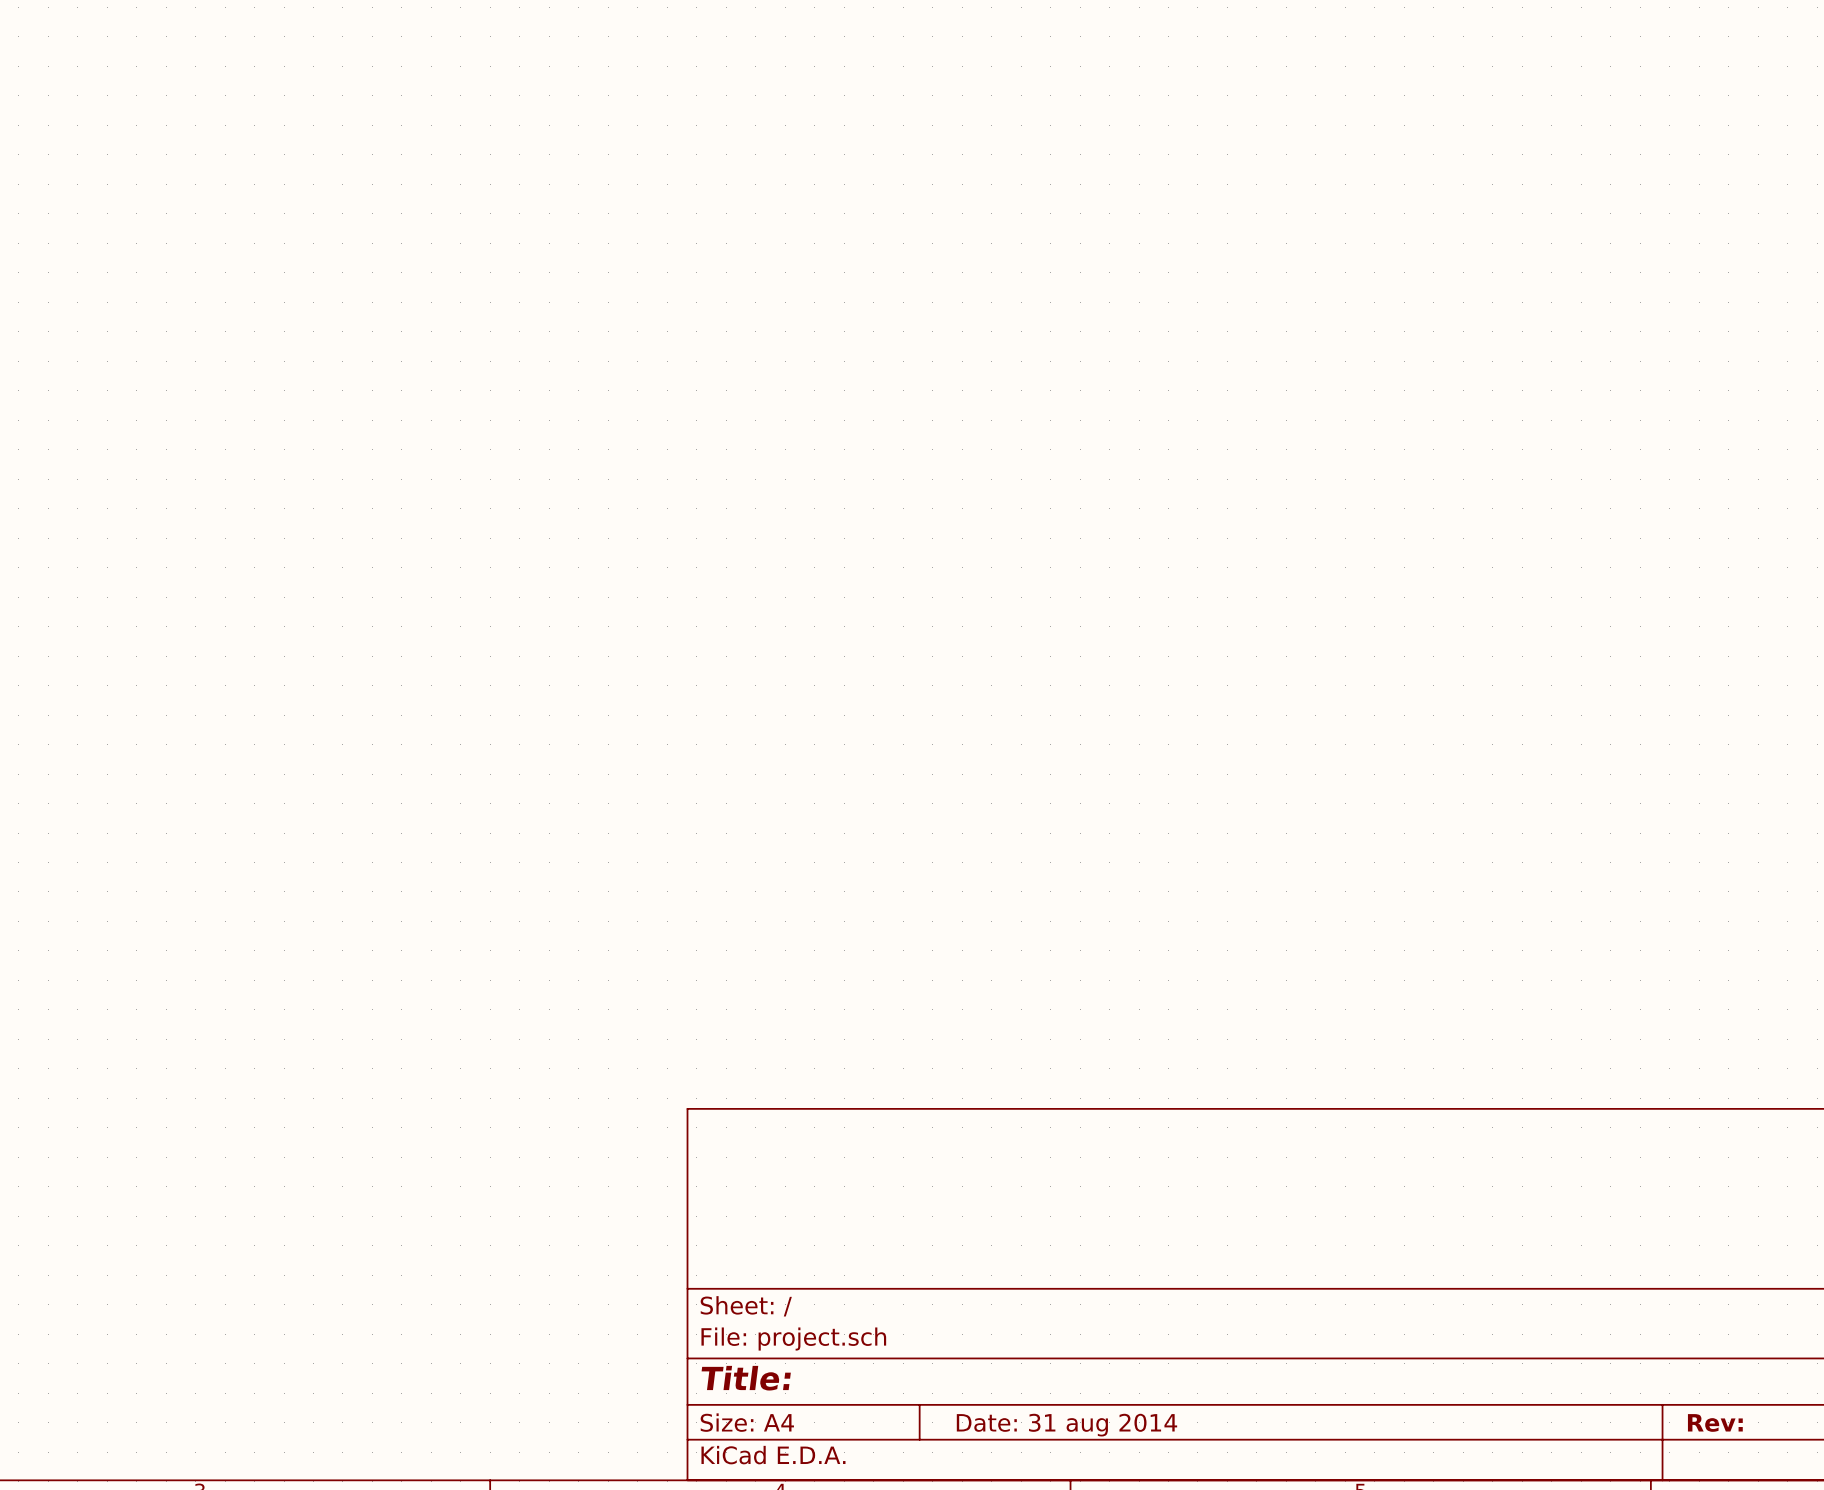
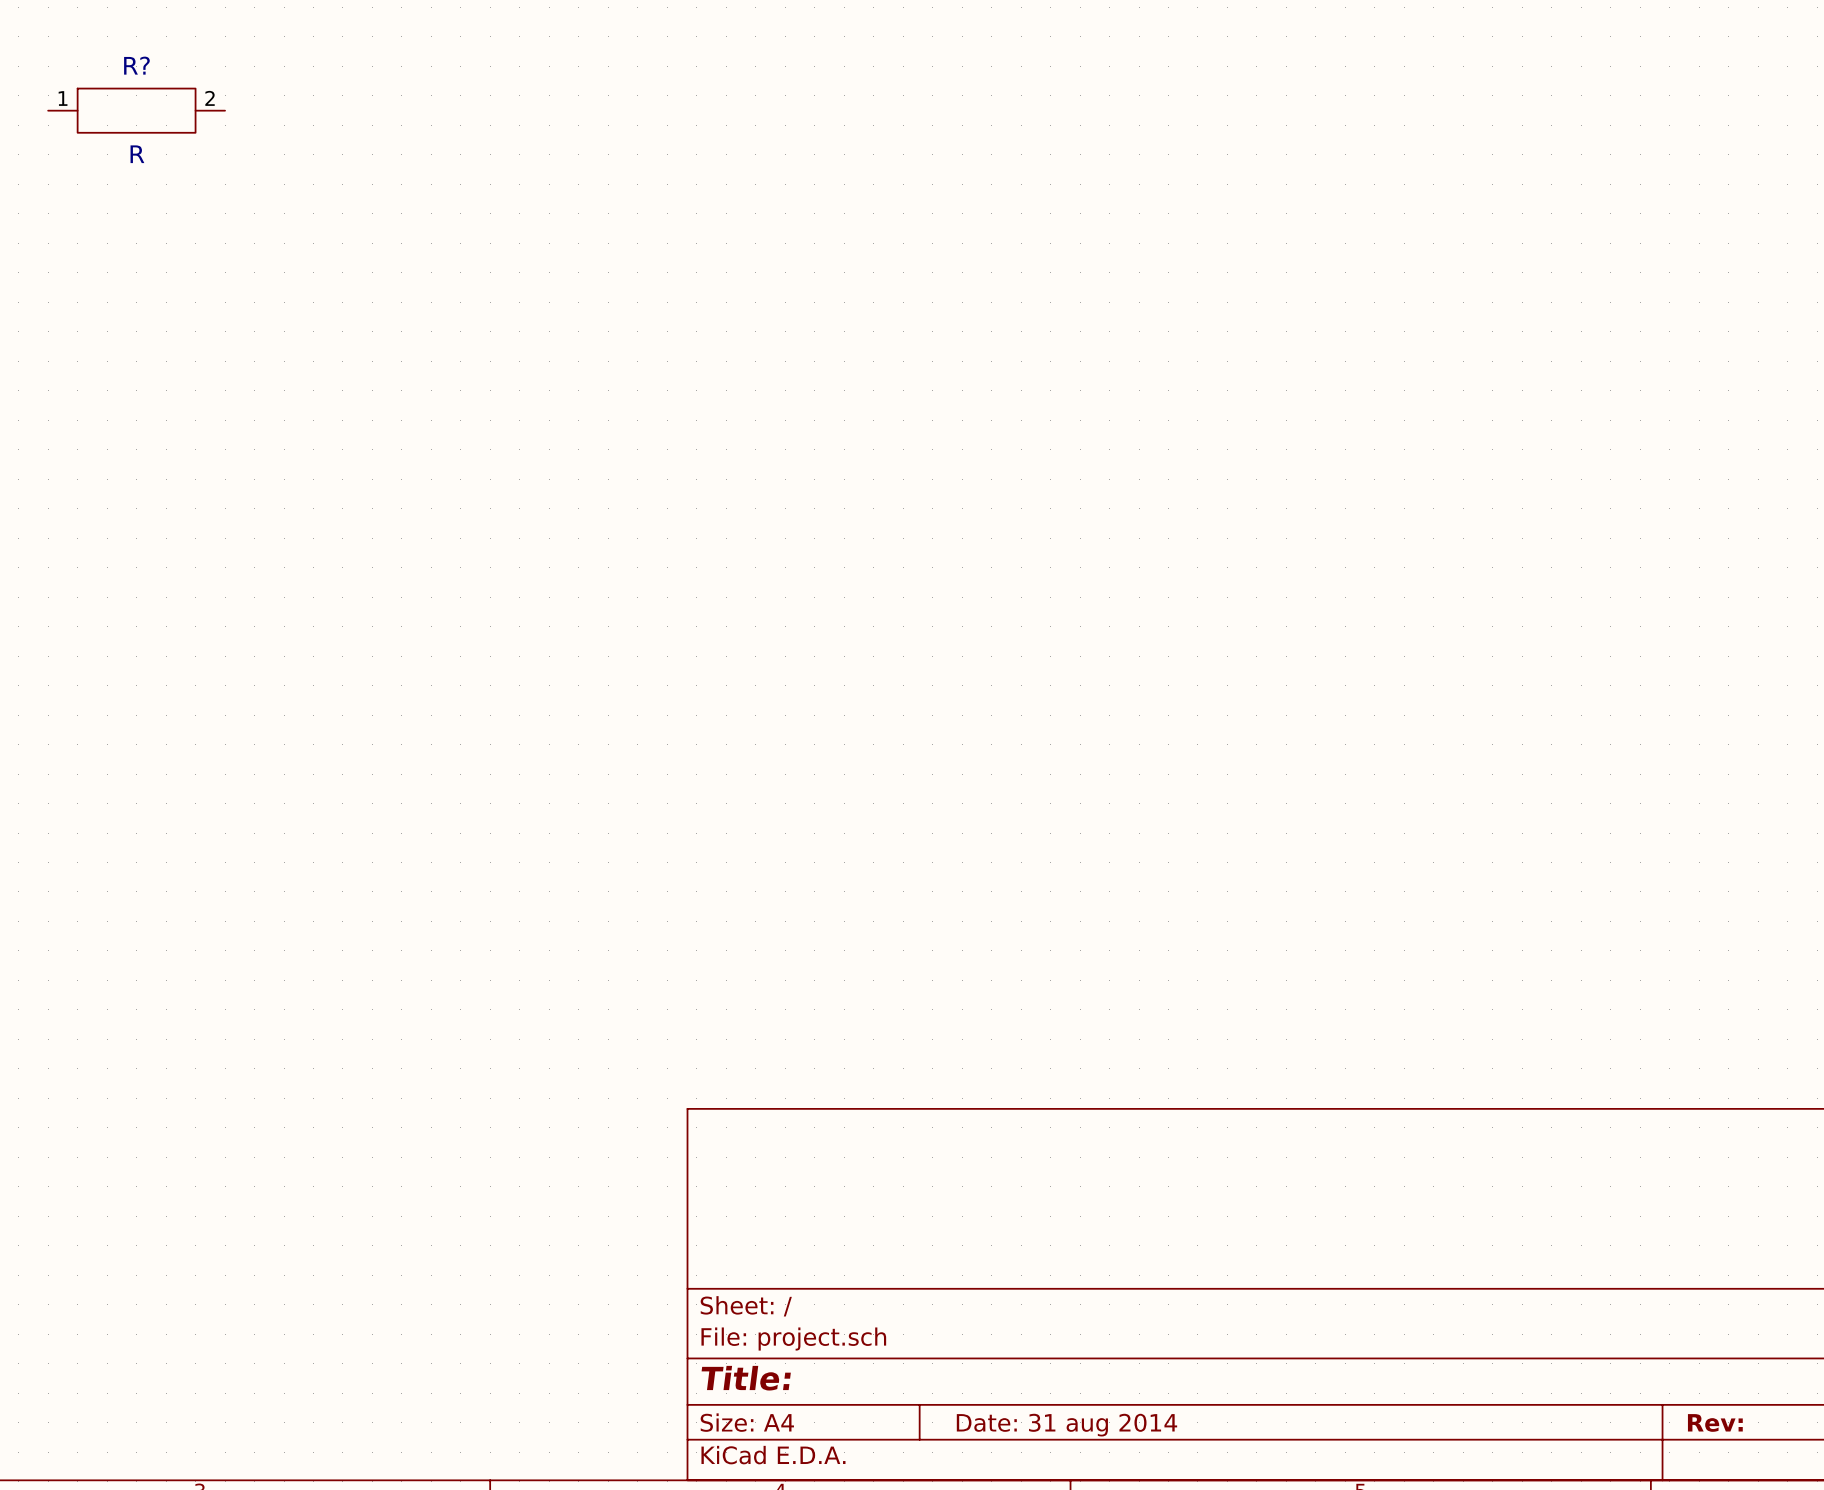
R?: none -> R (136, 110)

